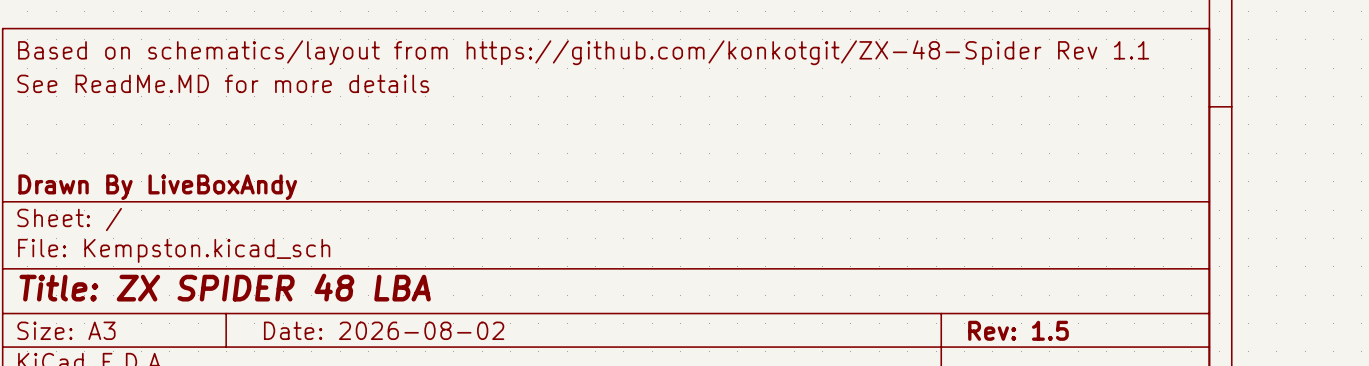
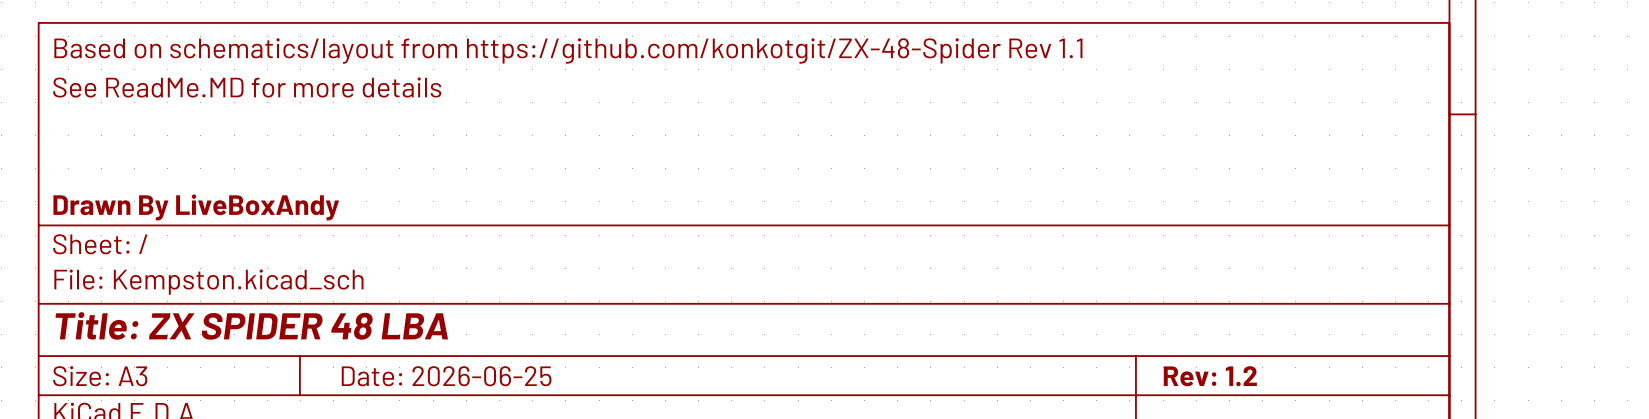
title block: Date: 2026-08-02 (384, 330) -> Date: 2026-06-25 (446, 376)
title block: Rev: 1.5 (1018, 330) -> Rev: 1.2 (1210, 376)

